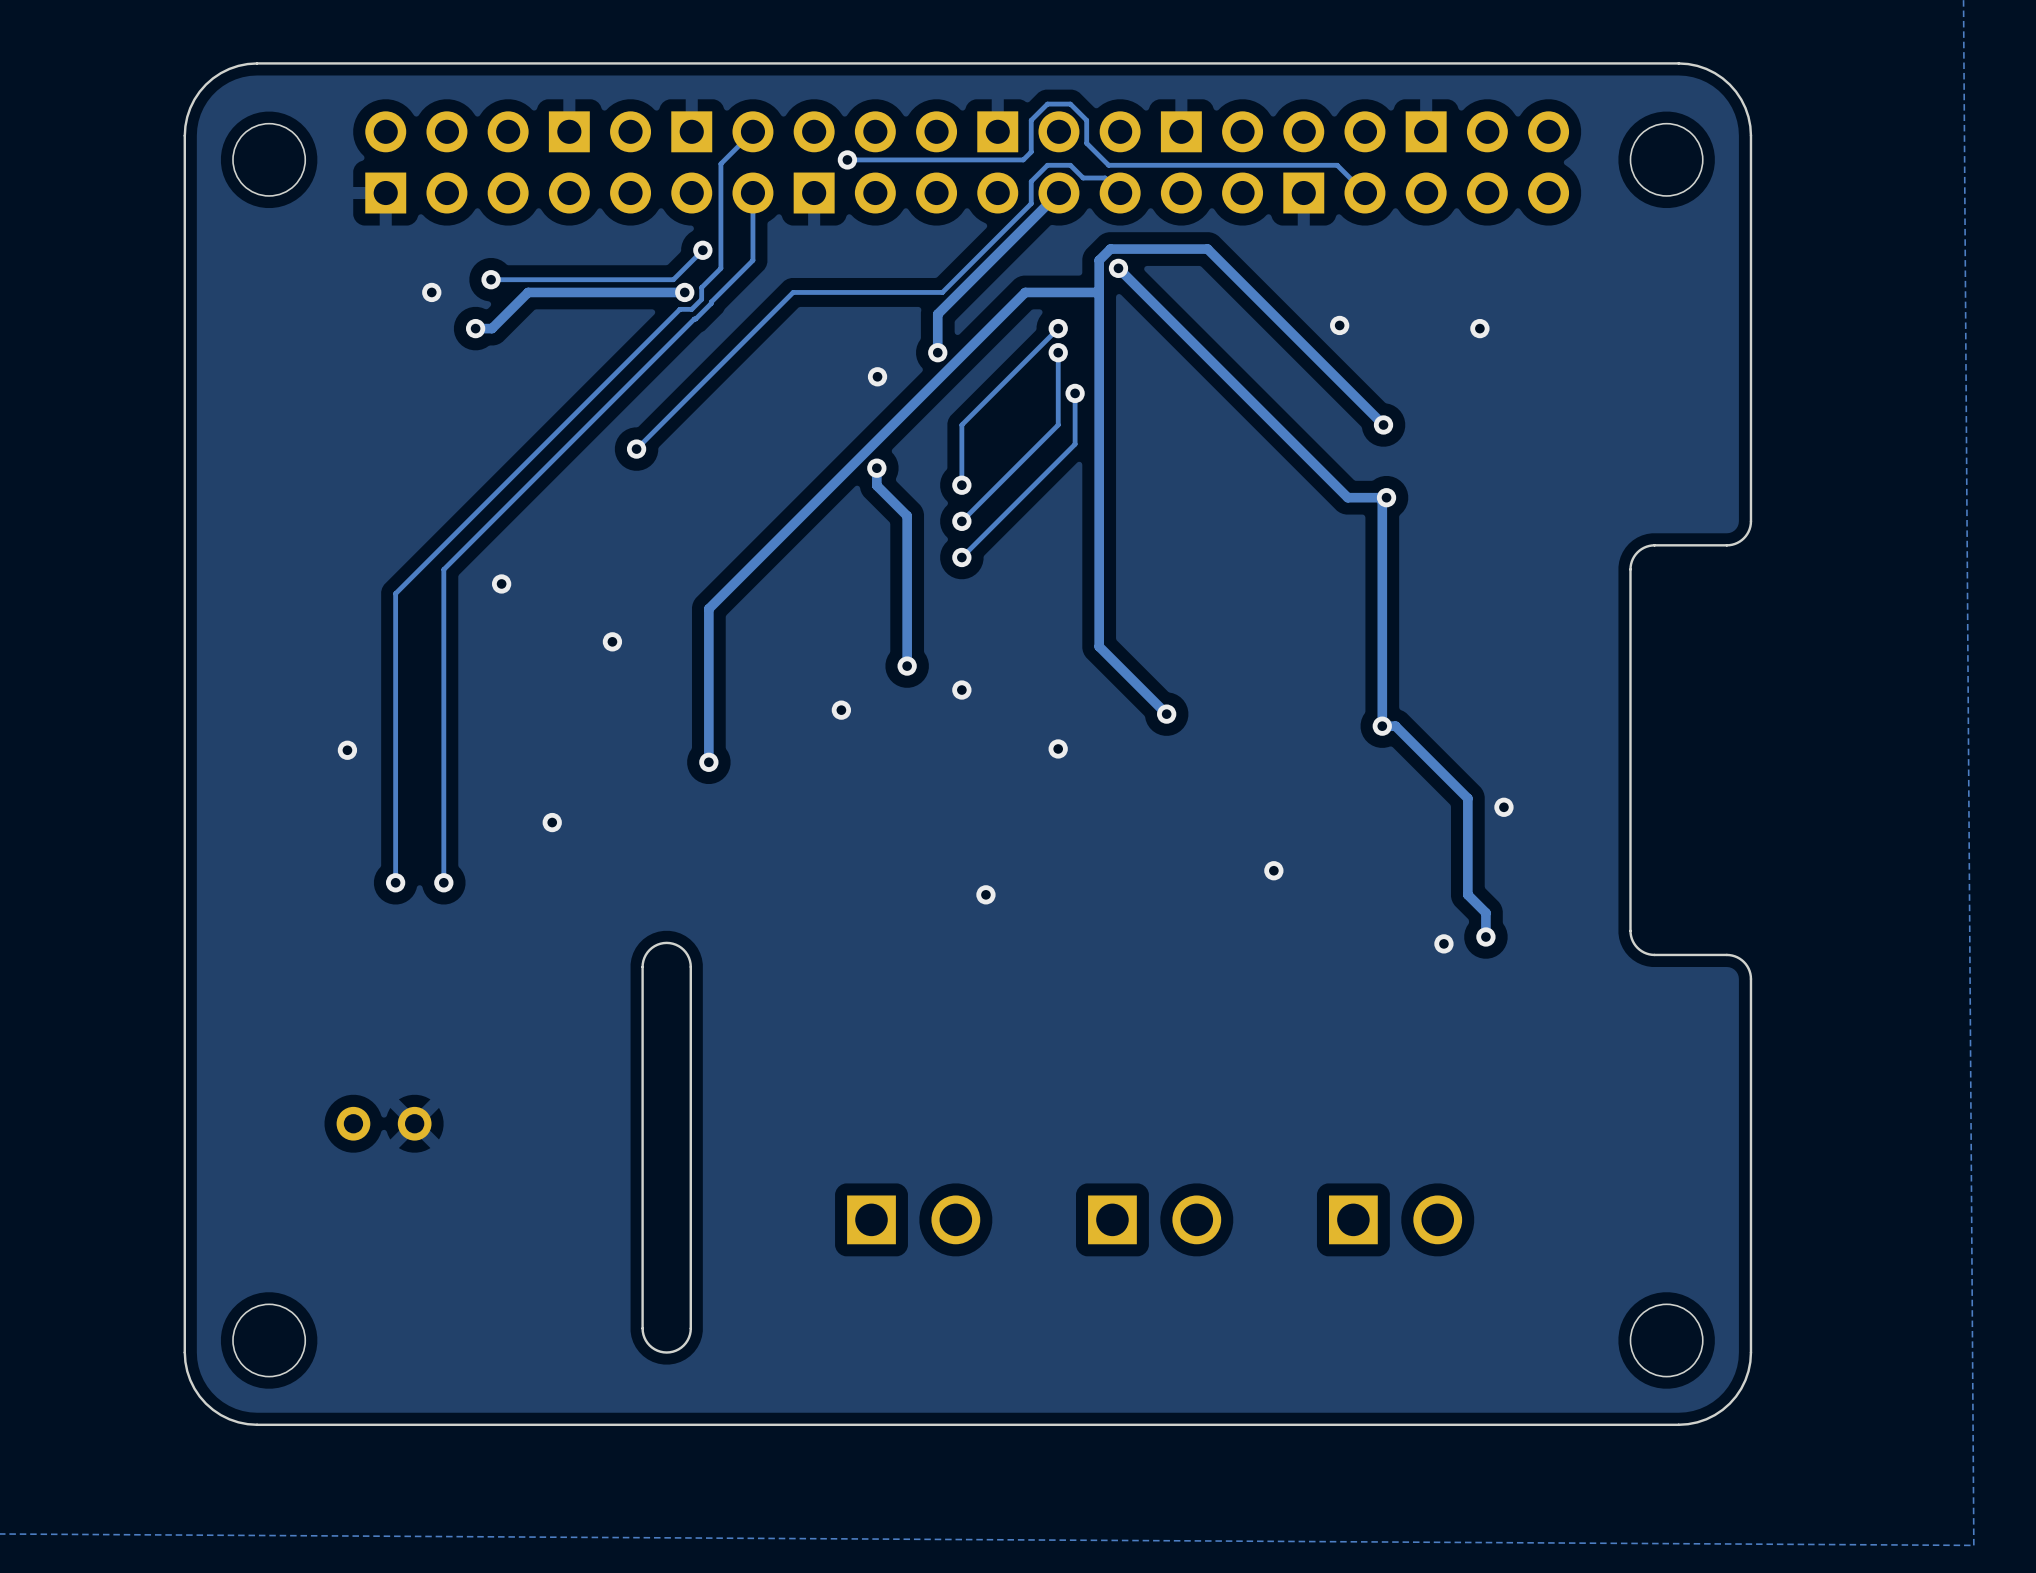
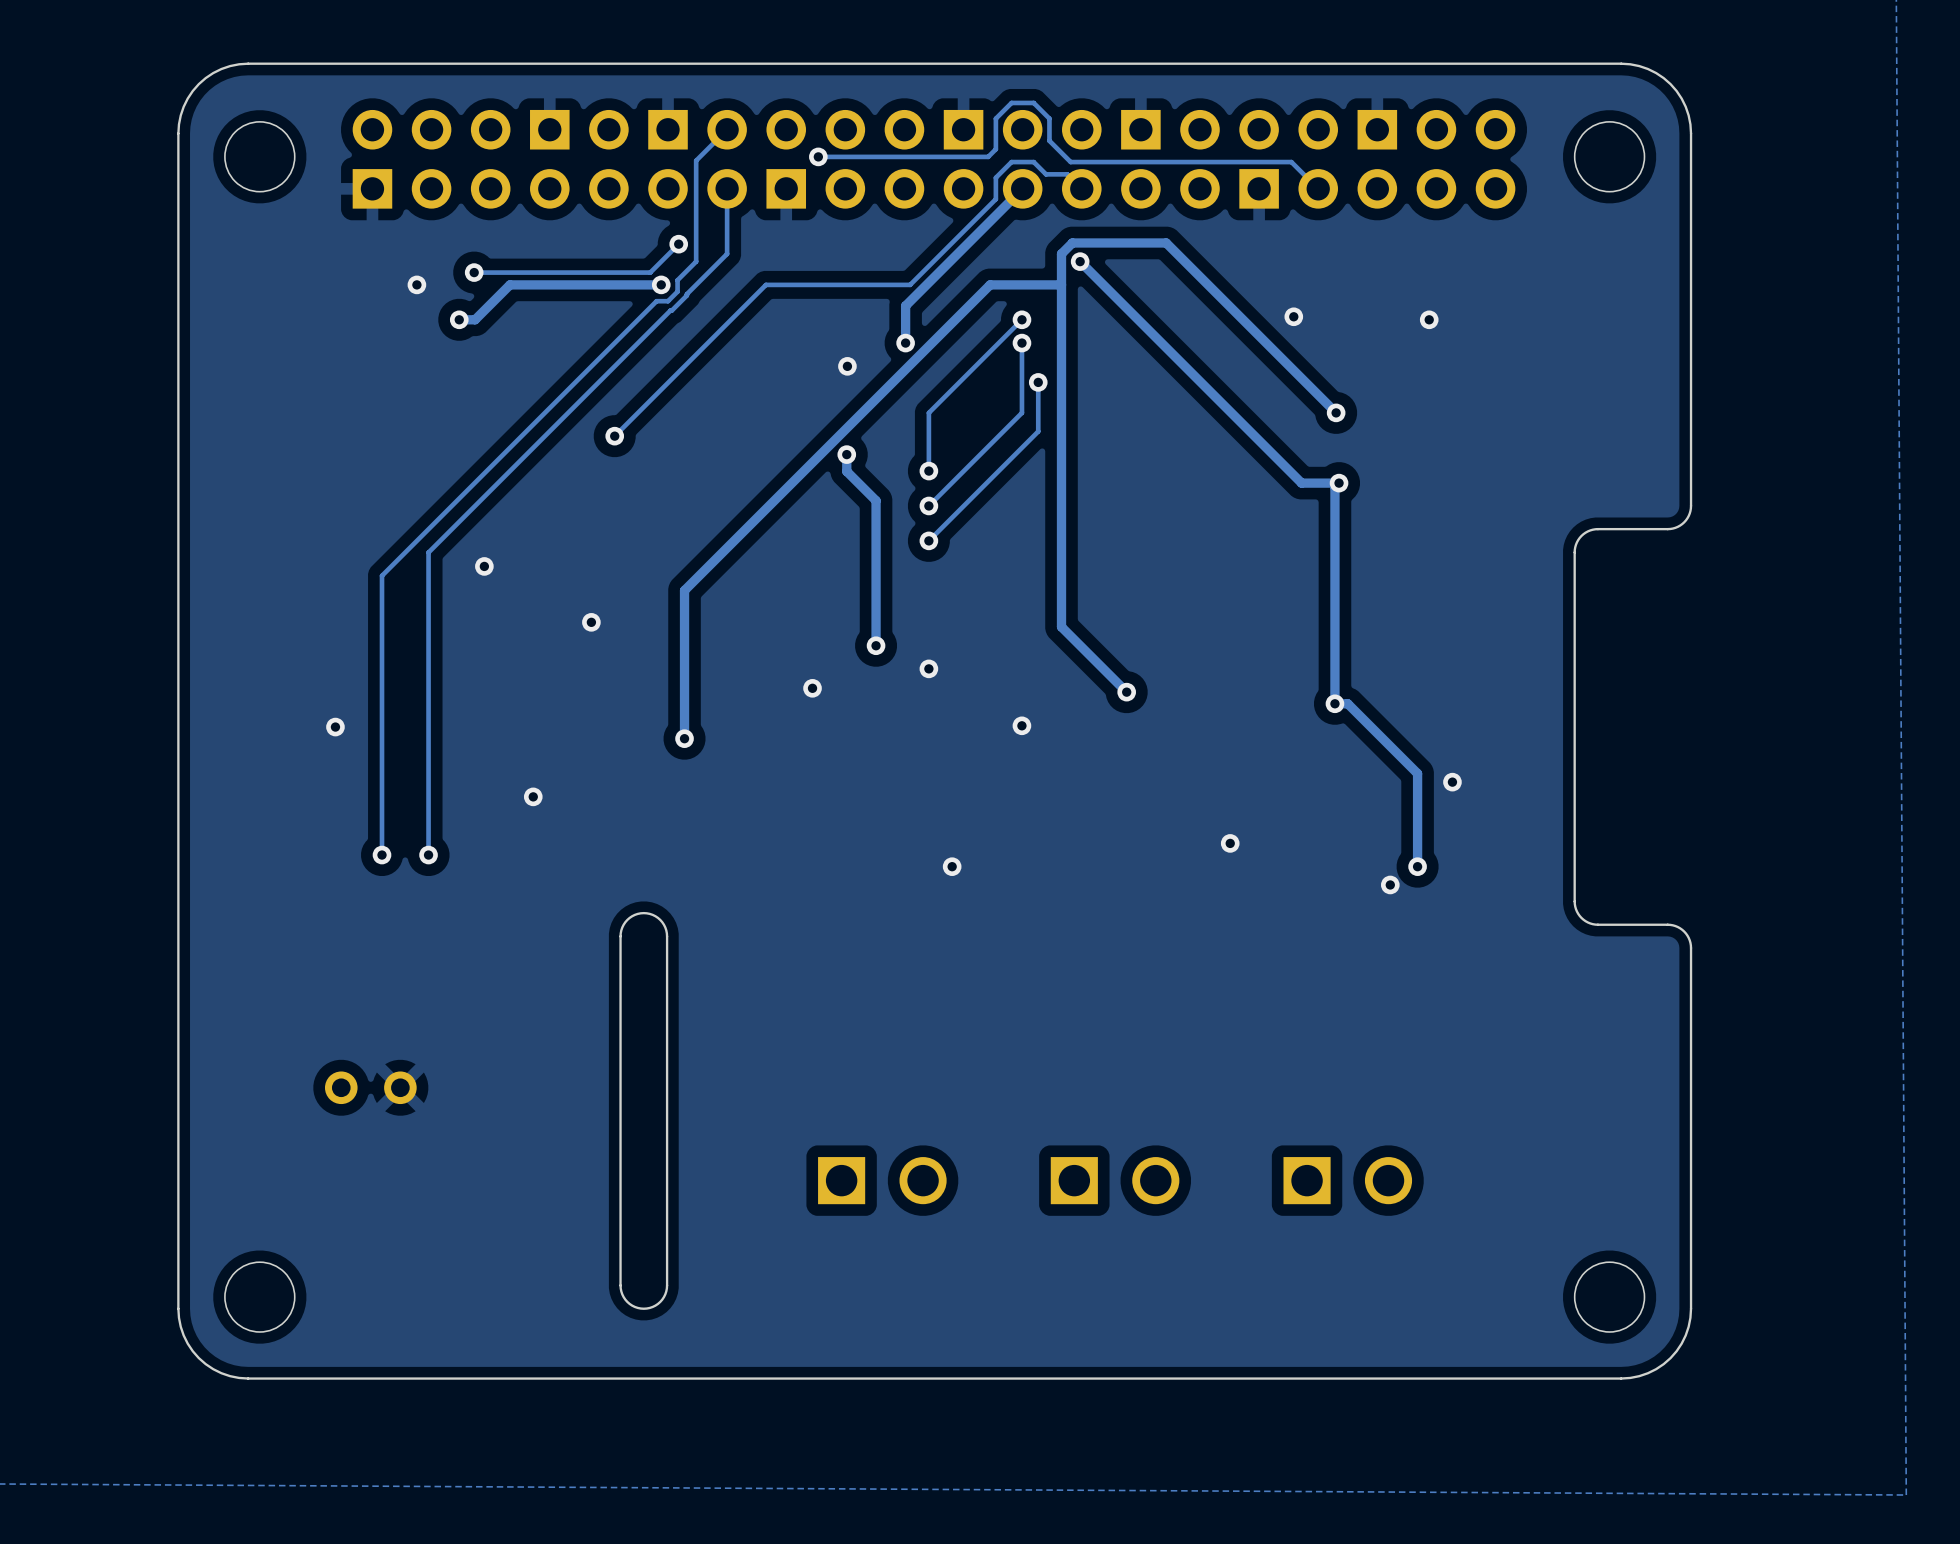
track: (1467, 894) (1485, 912) (1485, 937) -> none
via: none -> (1417, 866)
via: none -> (1390, 884)
via: (1485, 937) -> none
via: (1443, 943) -> none

